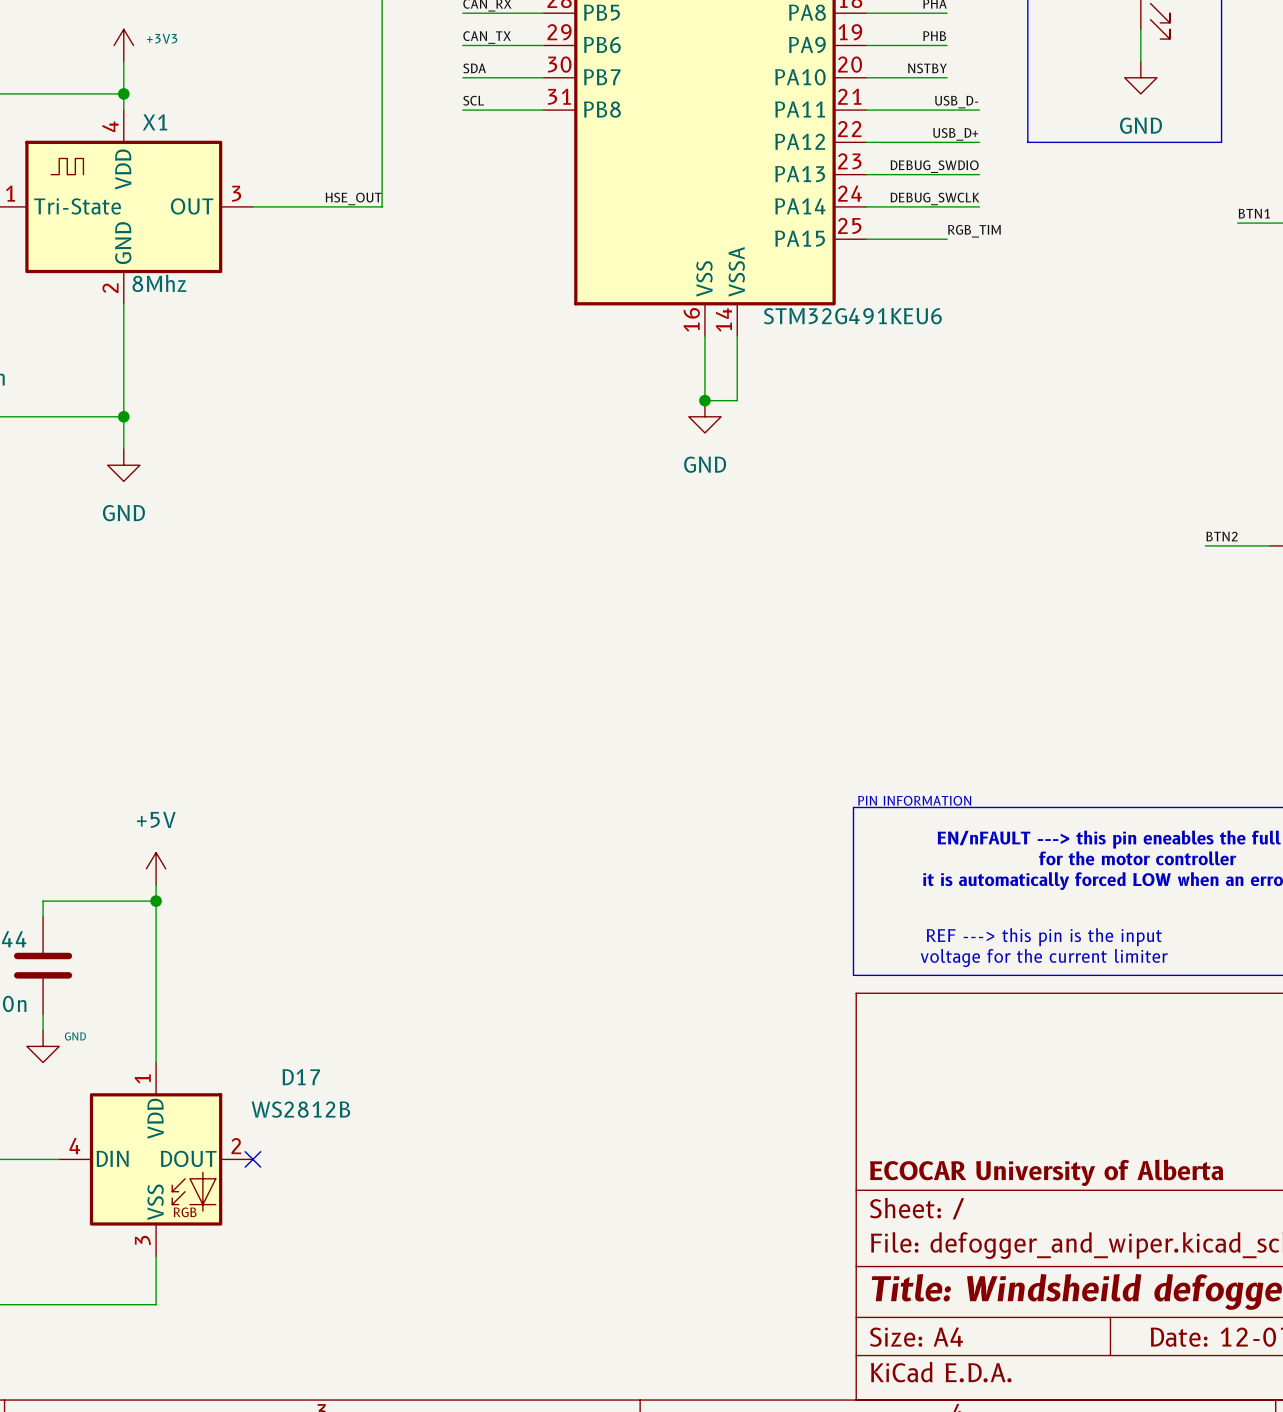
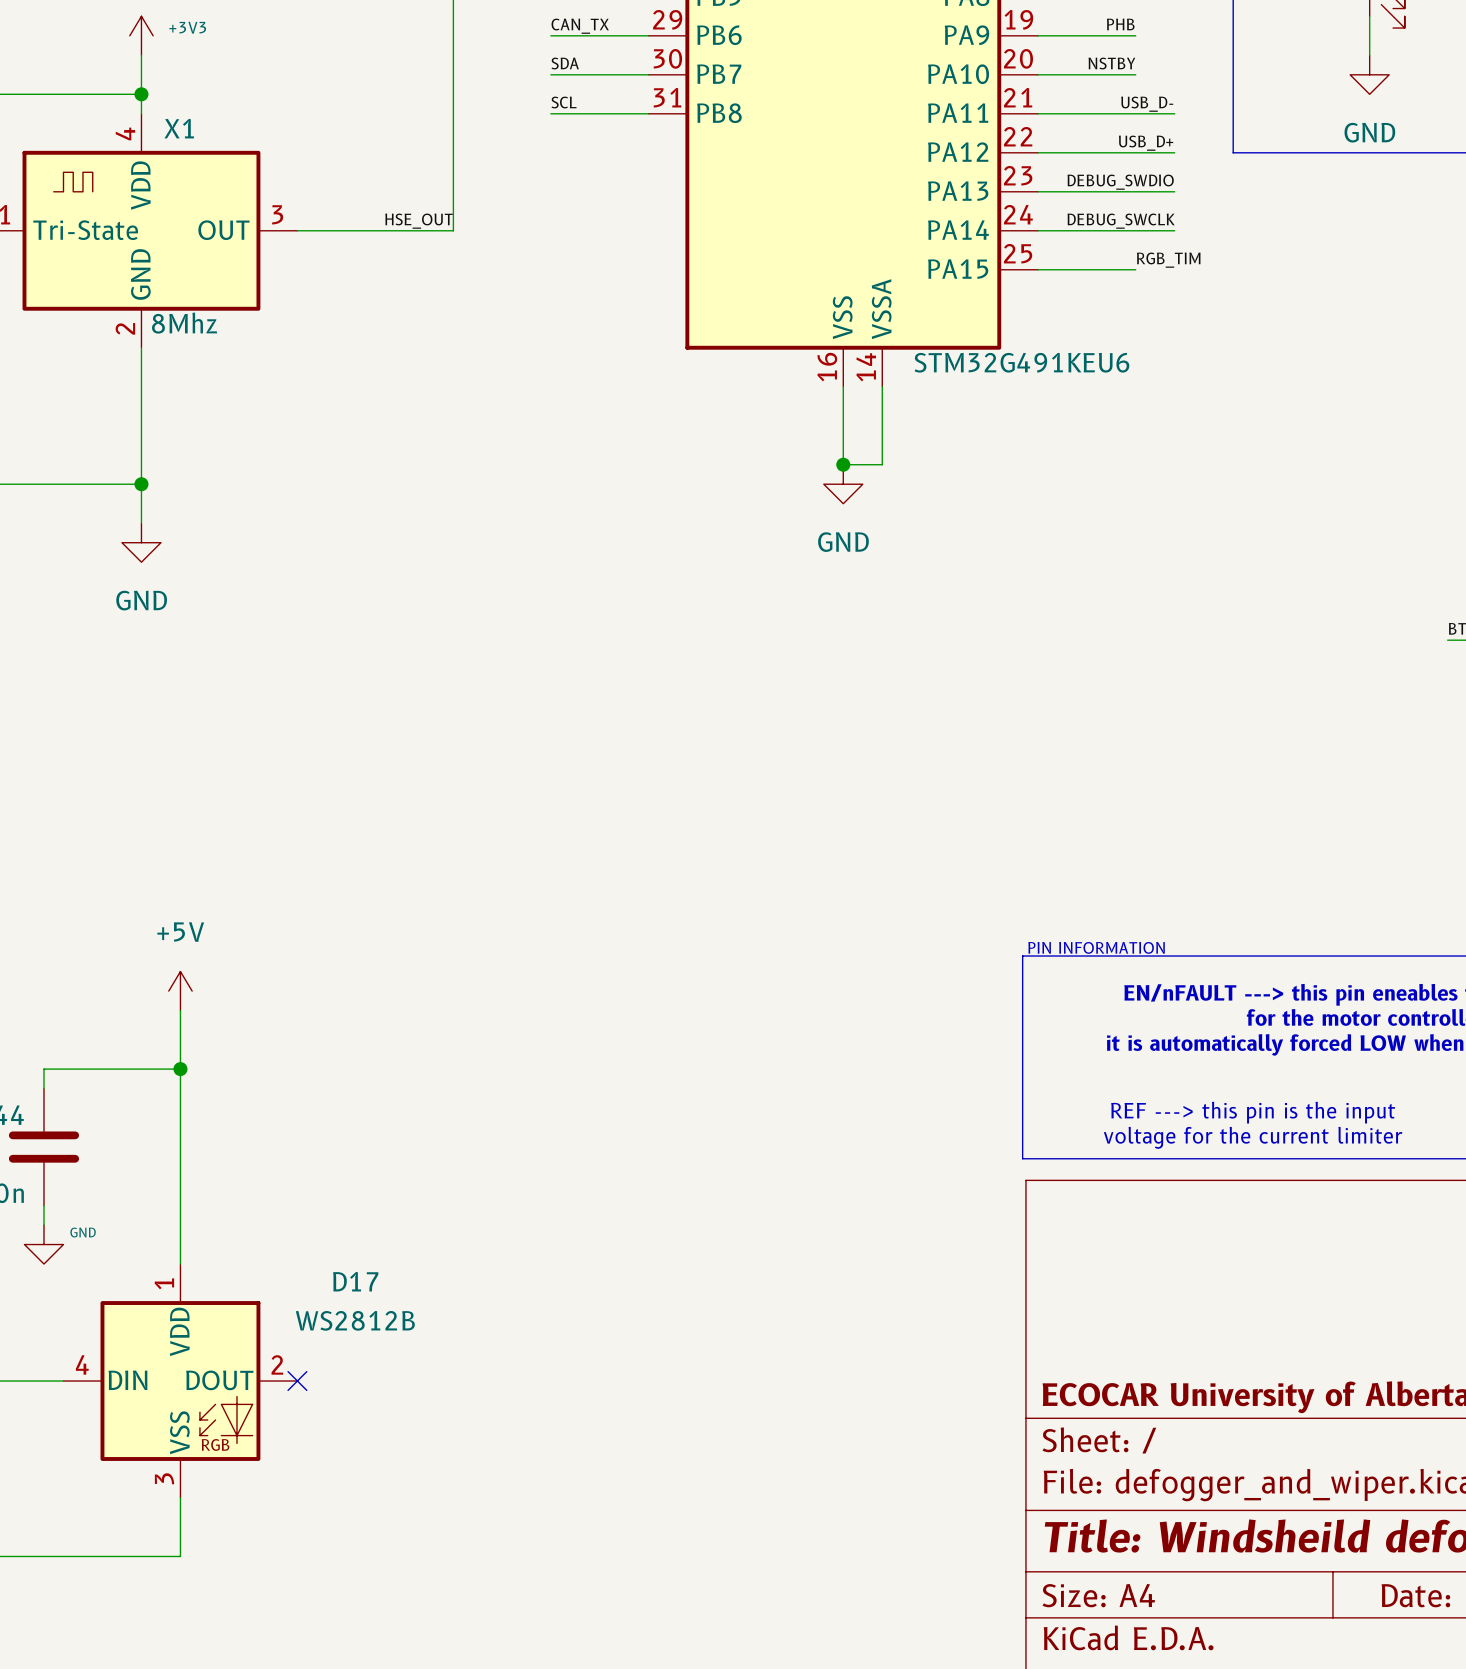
power symbol position: +5V (156, 868) -> +5V (180, 991)

